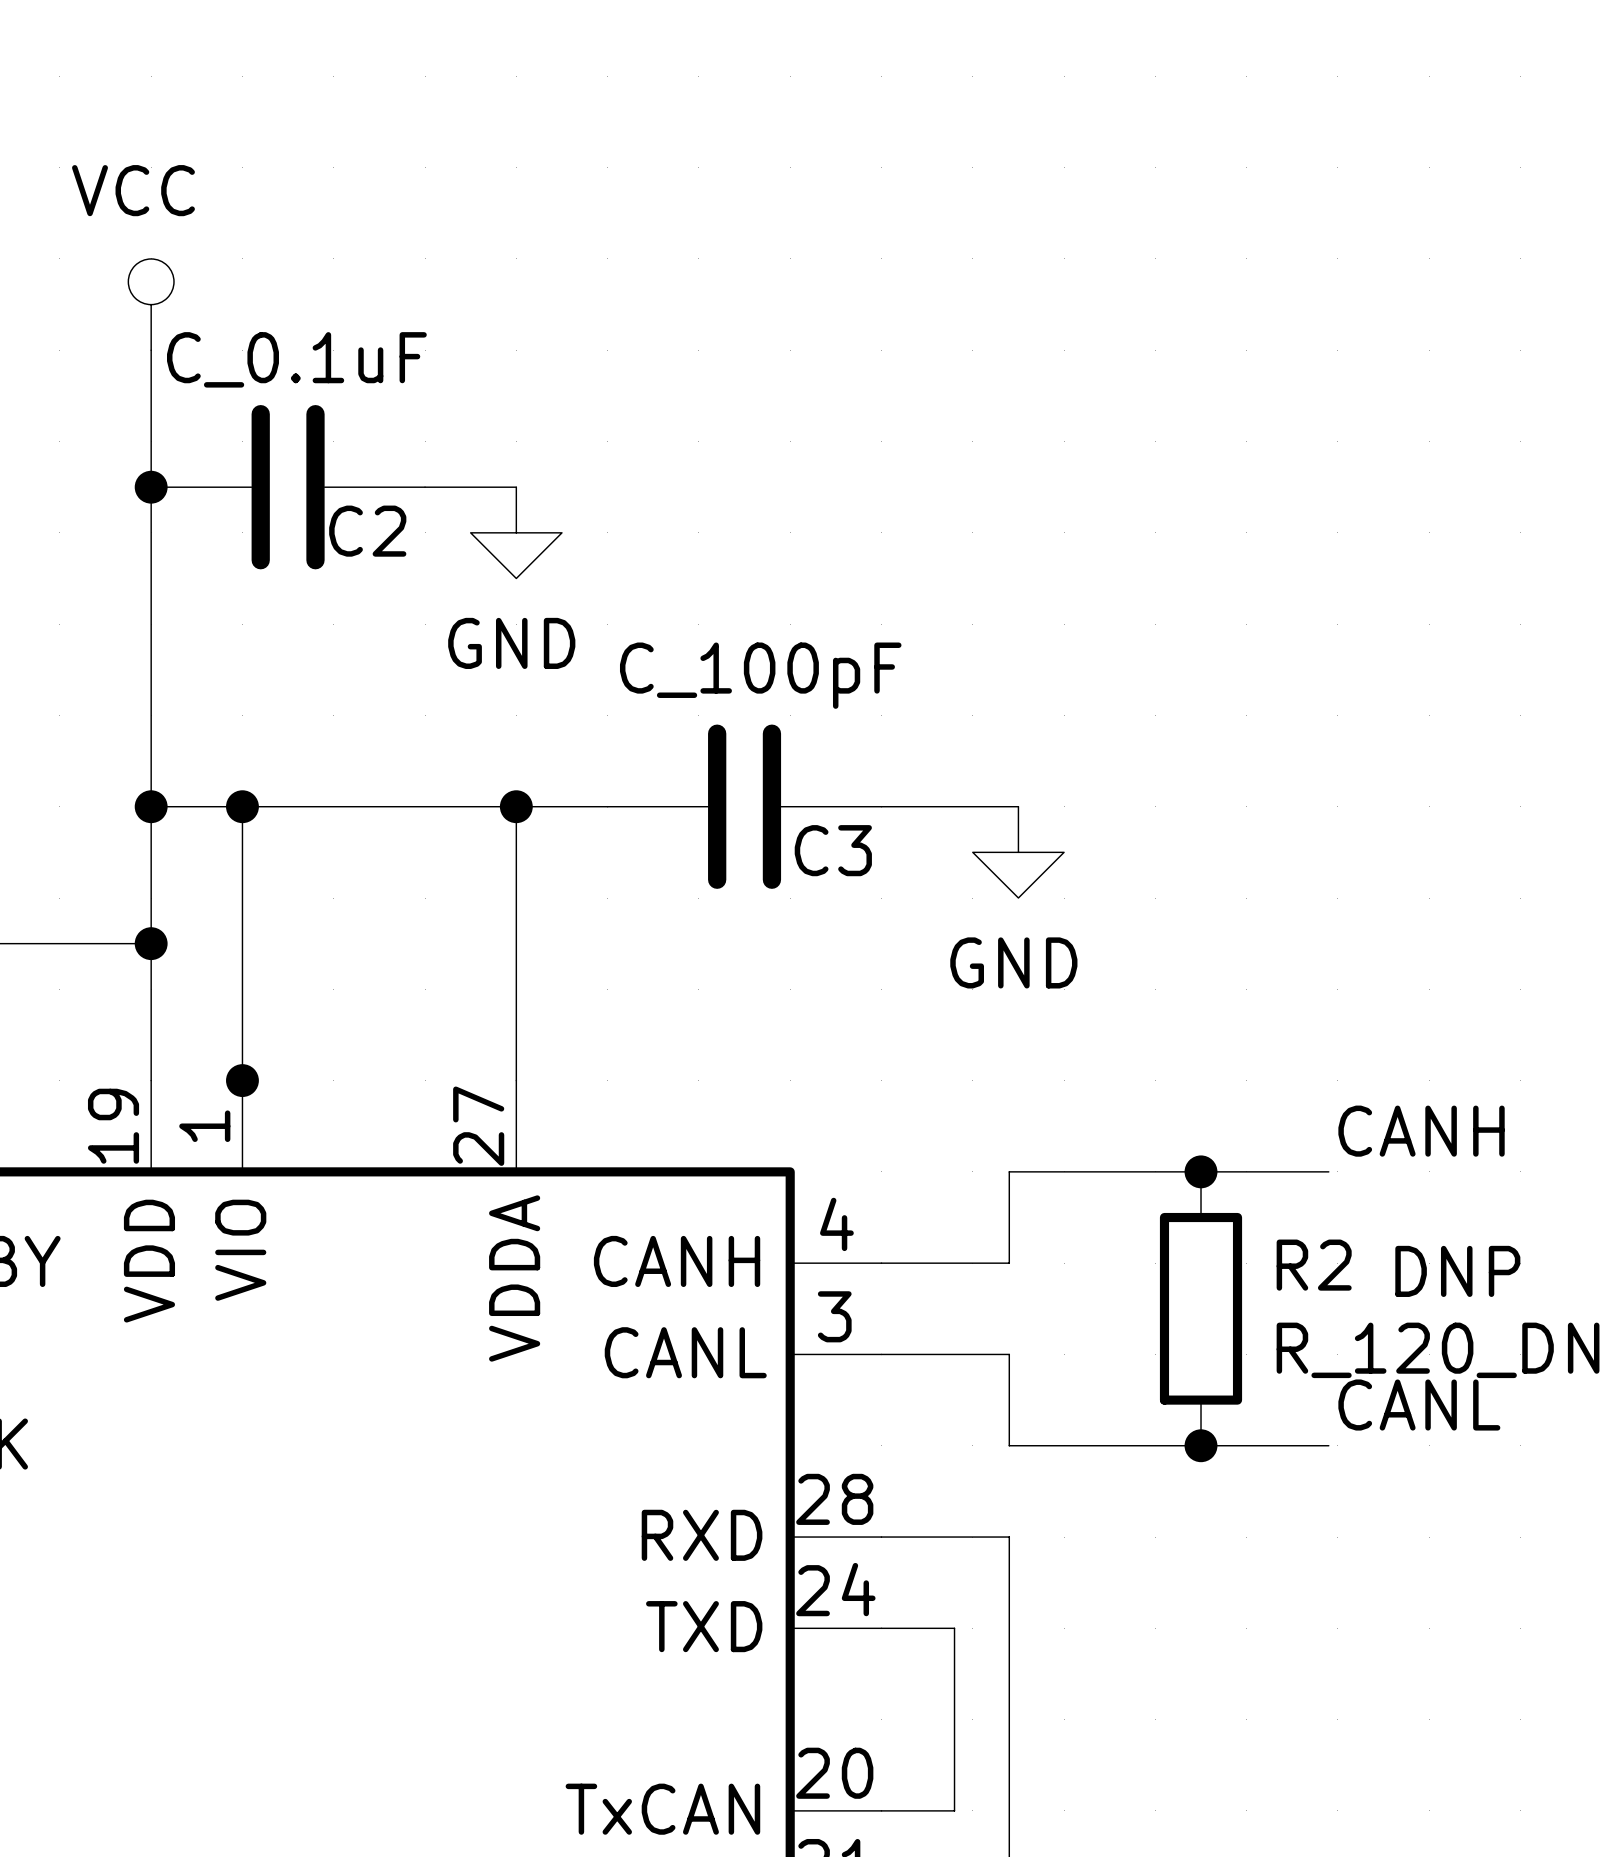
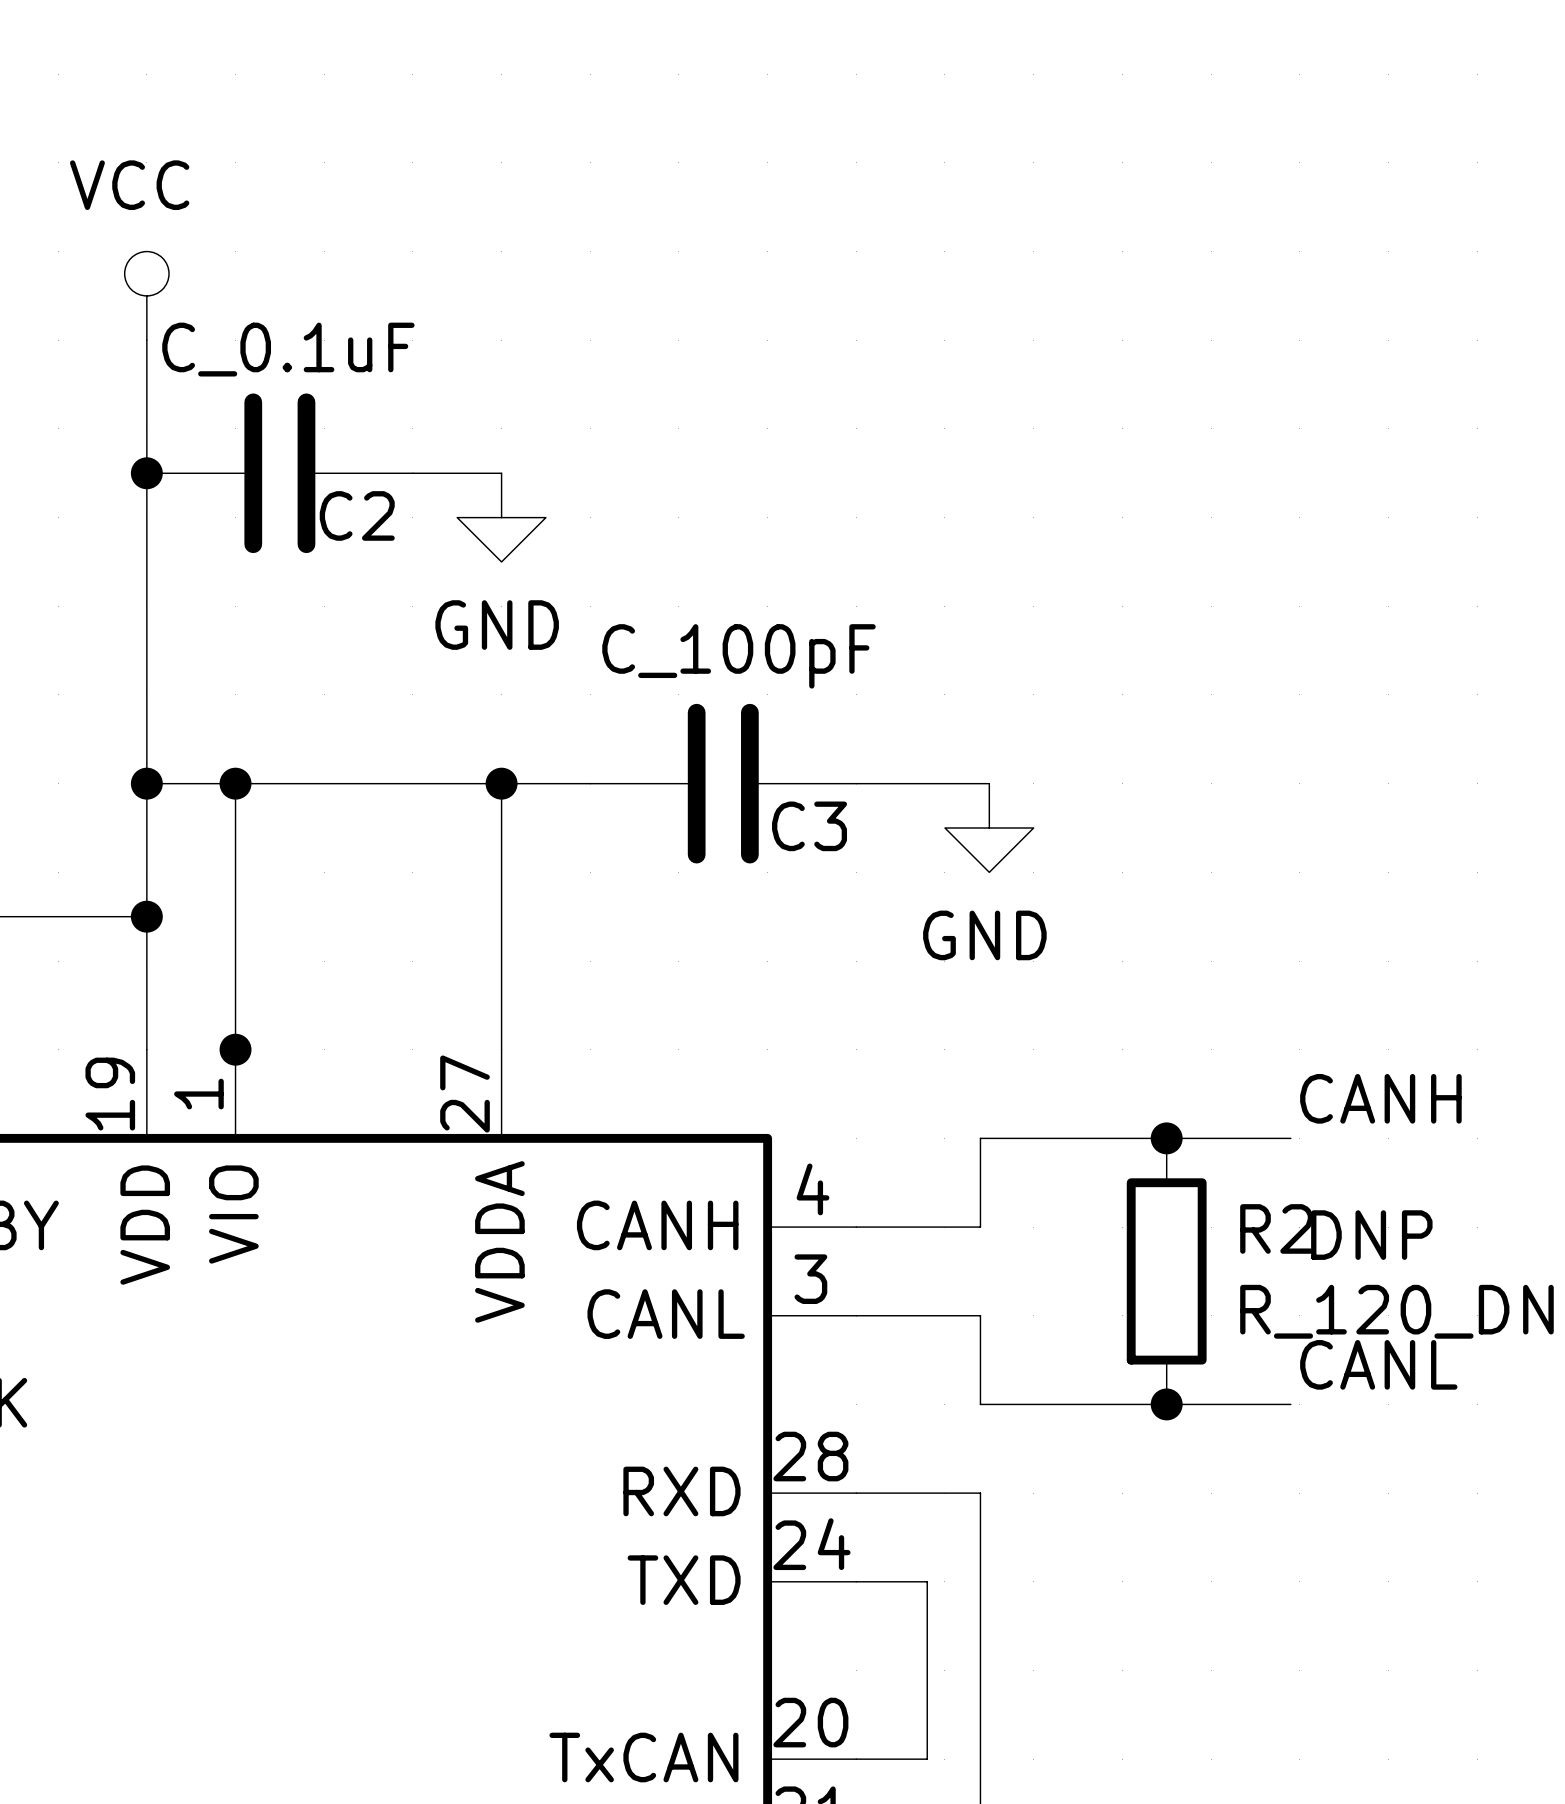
text position: DNP (1457, 1271) -> DNP (1371, 1235)

